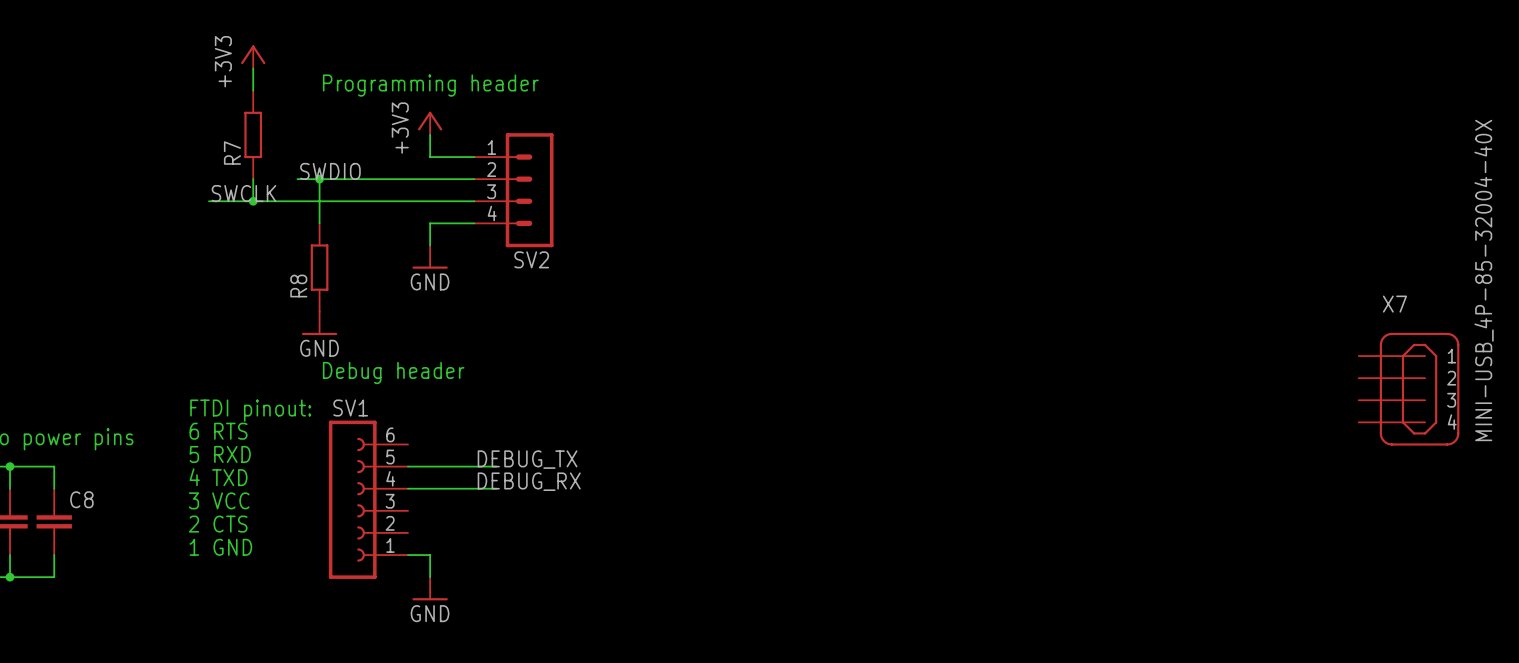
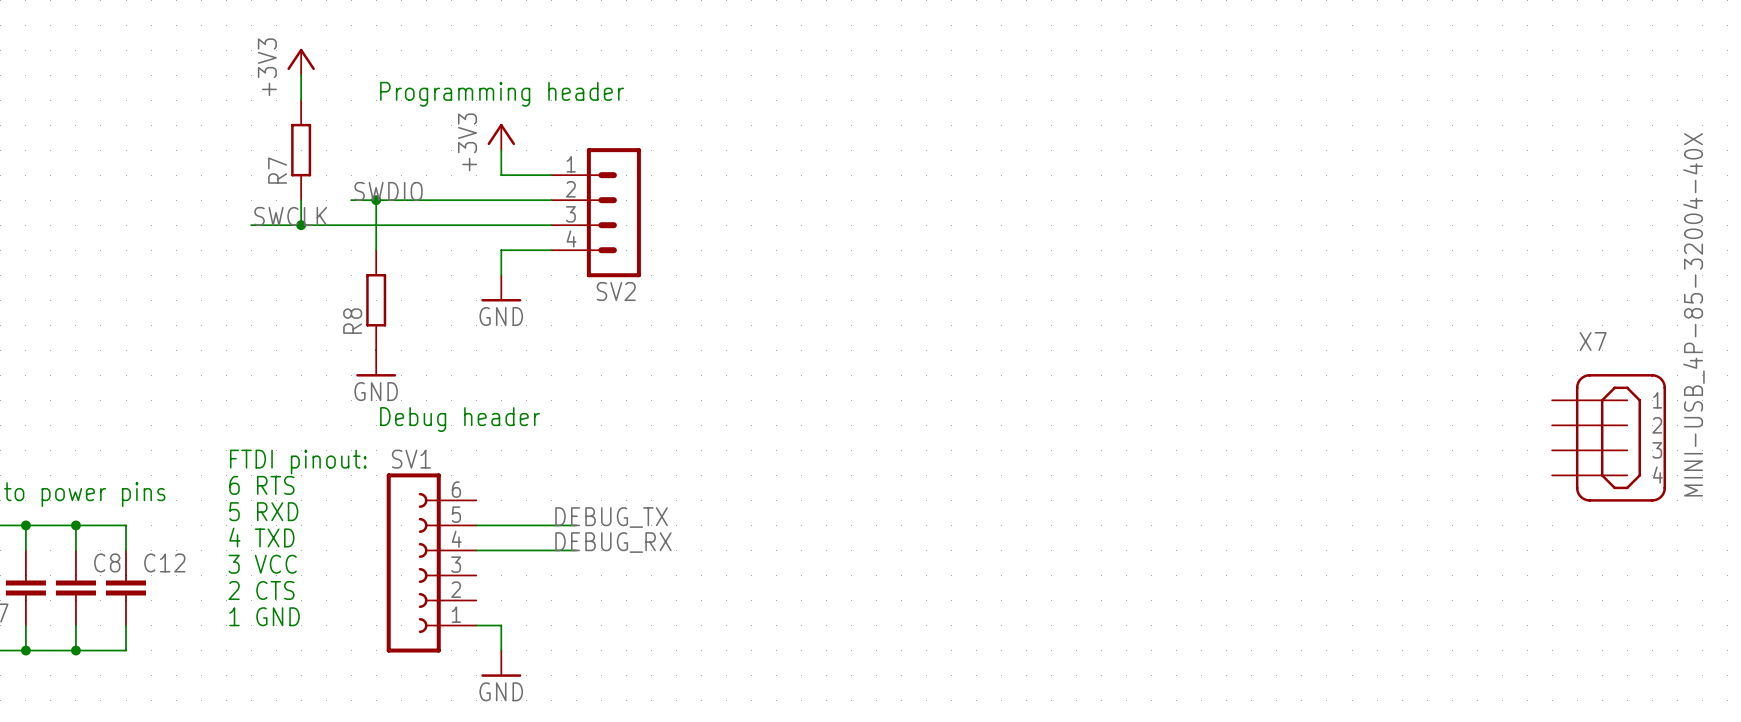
wire: none -> (75, 525) (126, 525) (126, 550)
junction: none -> (75, 525)
C12: none -> (126, 587)
wire: none -> (126, 625) (126, 650) (75, 650)
junction: none -> (75, 650)

